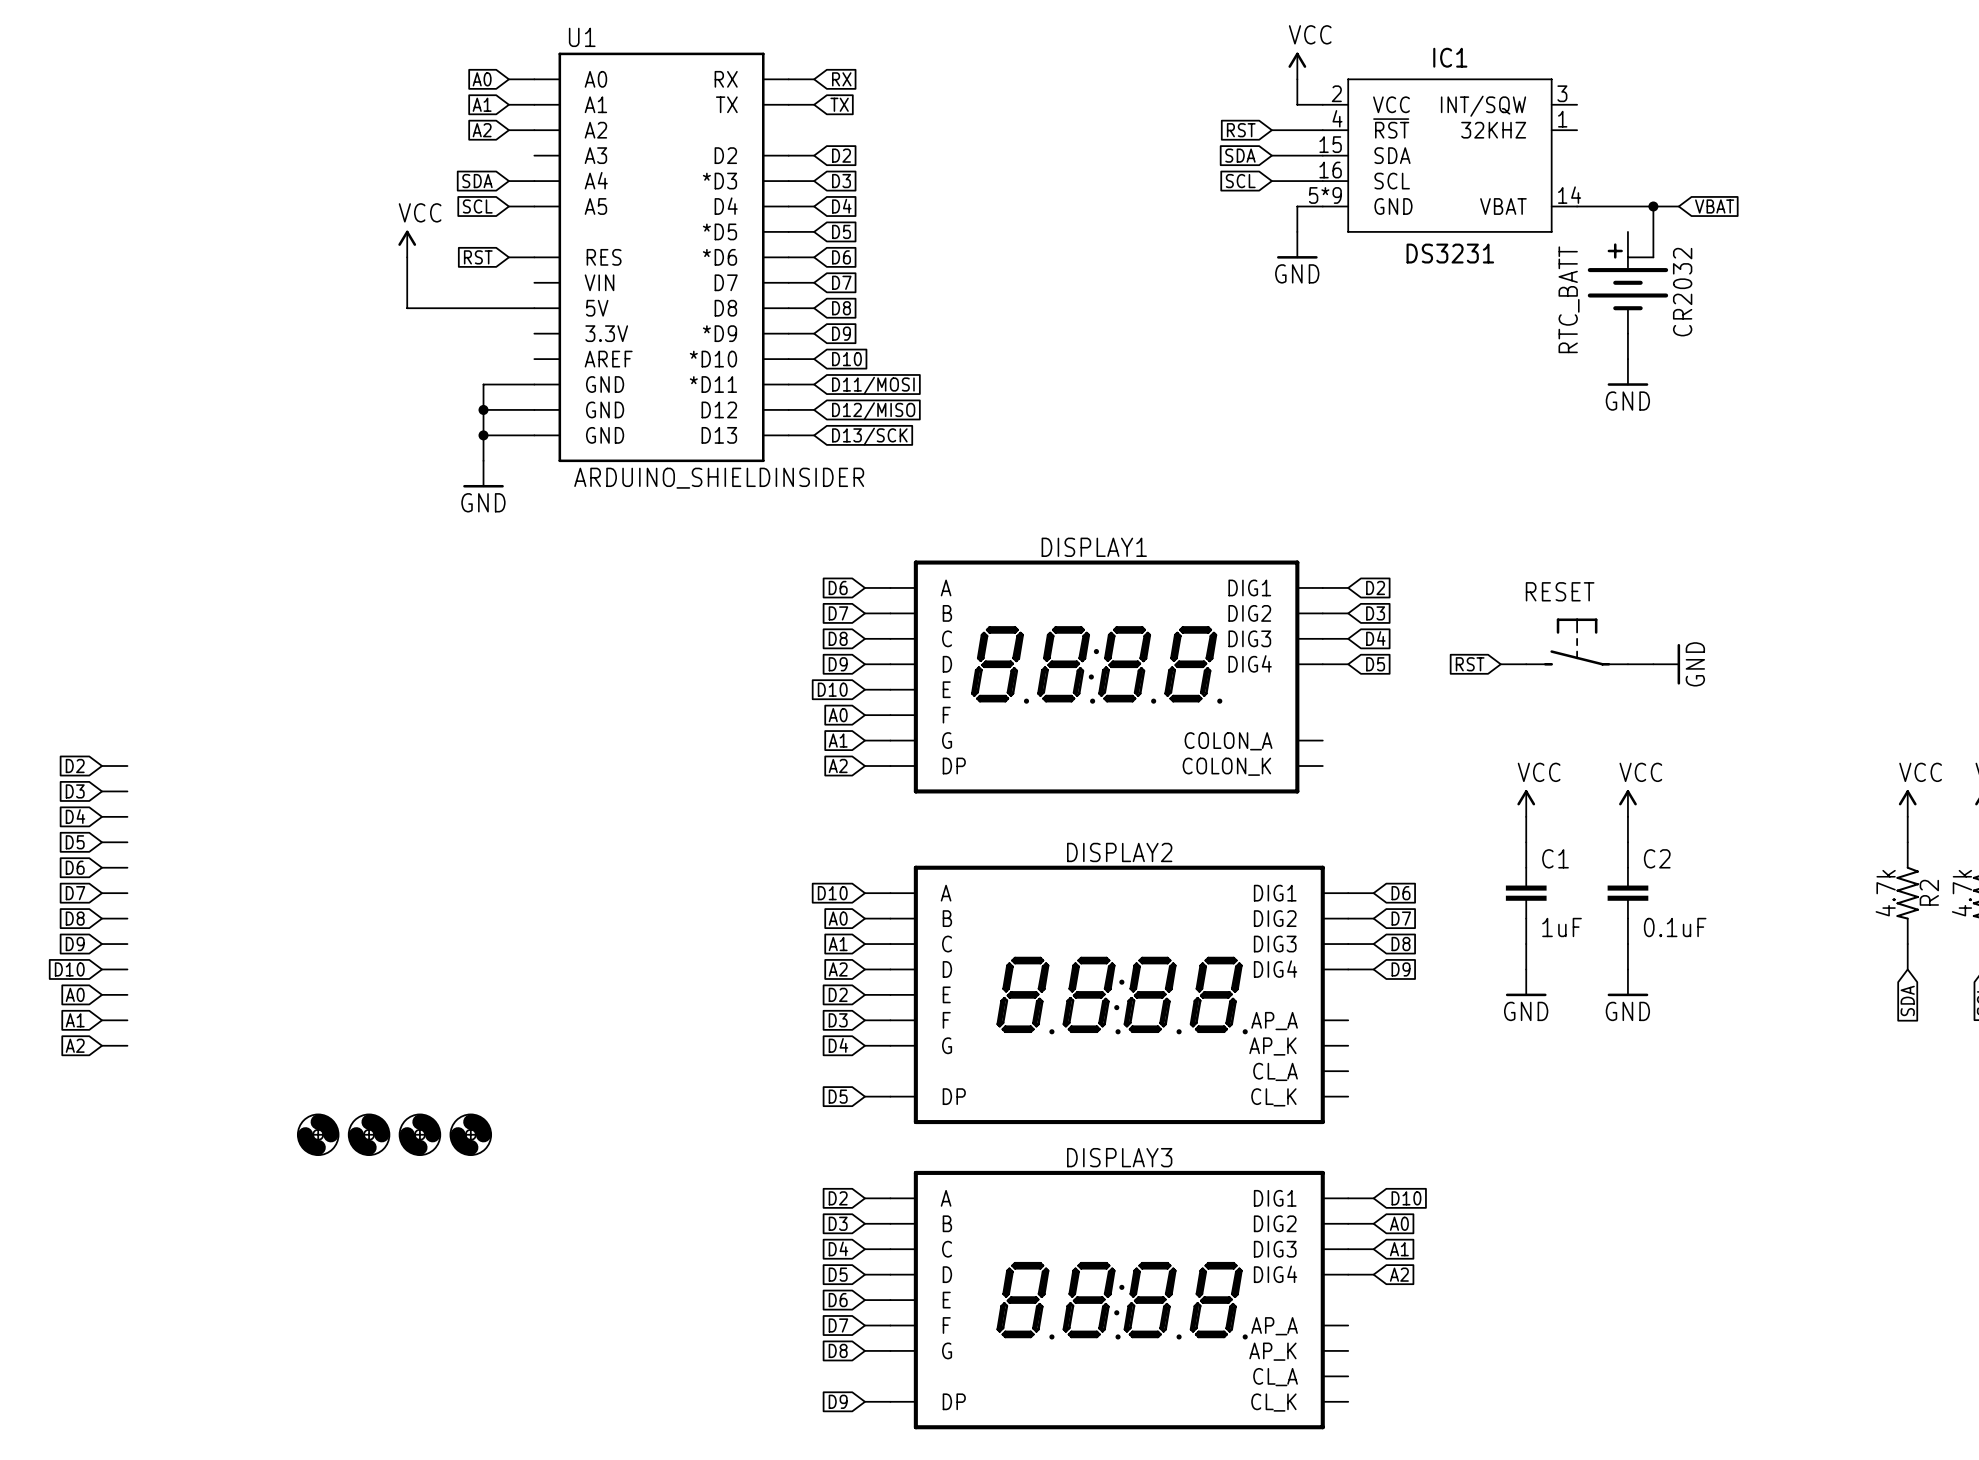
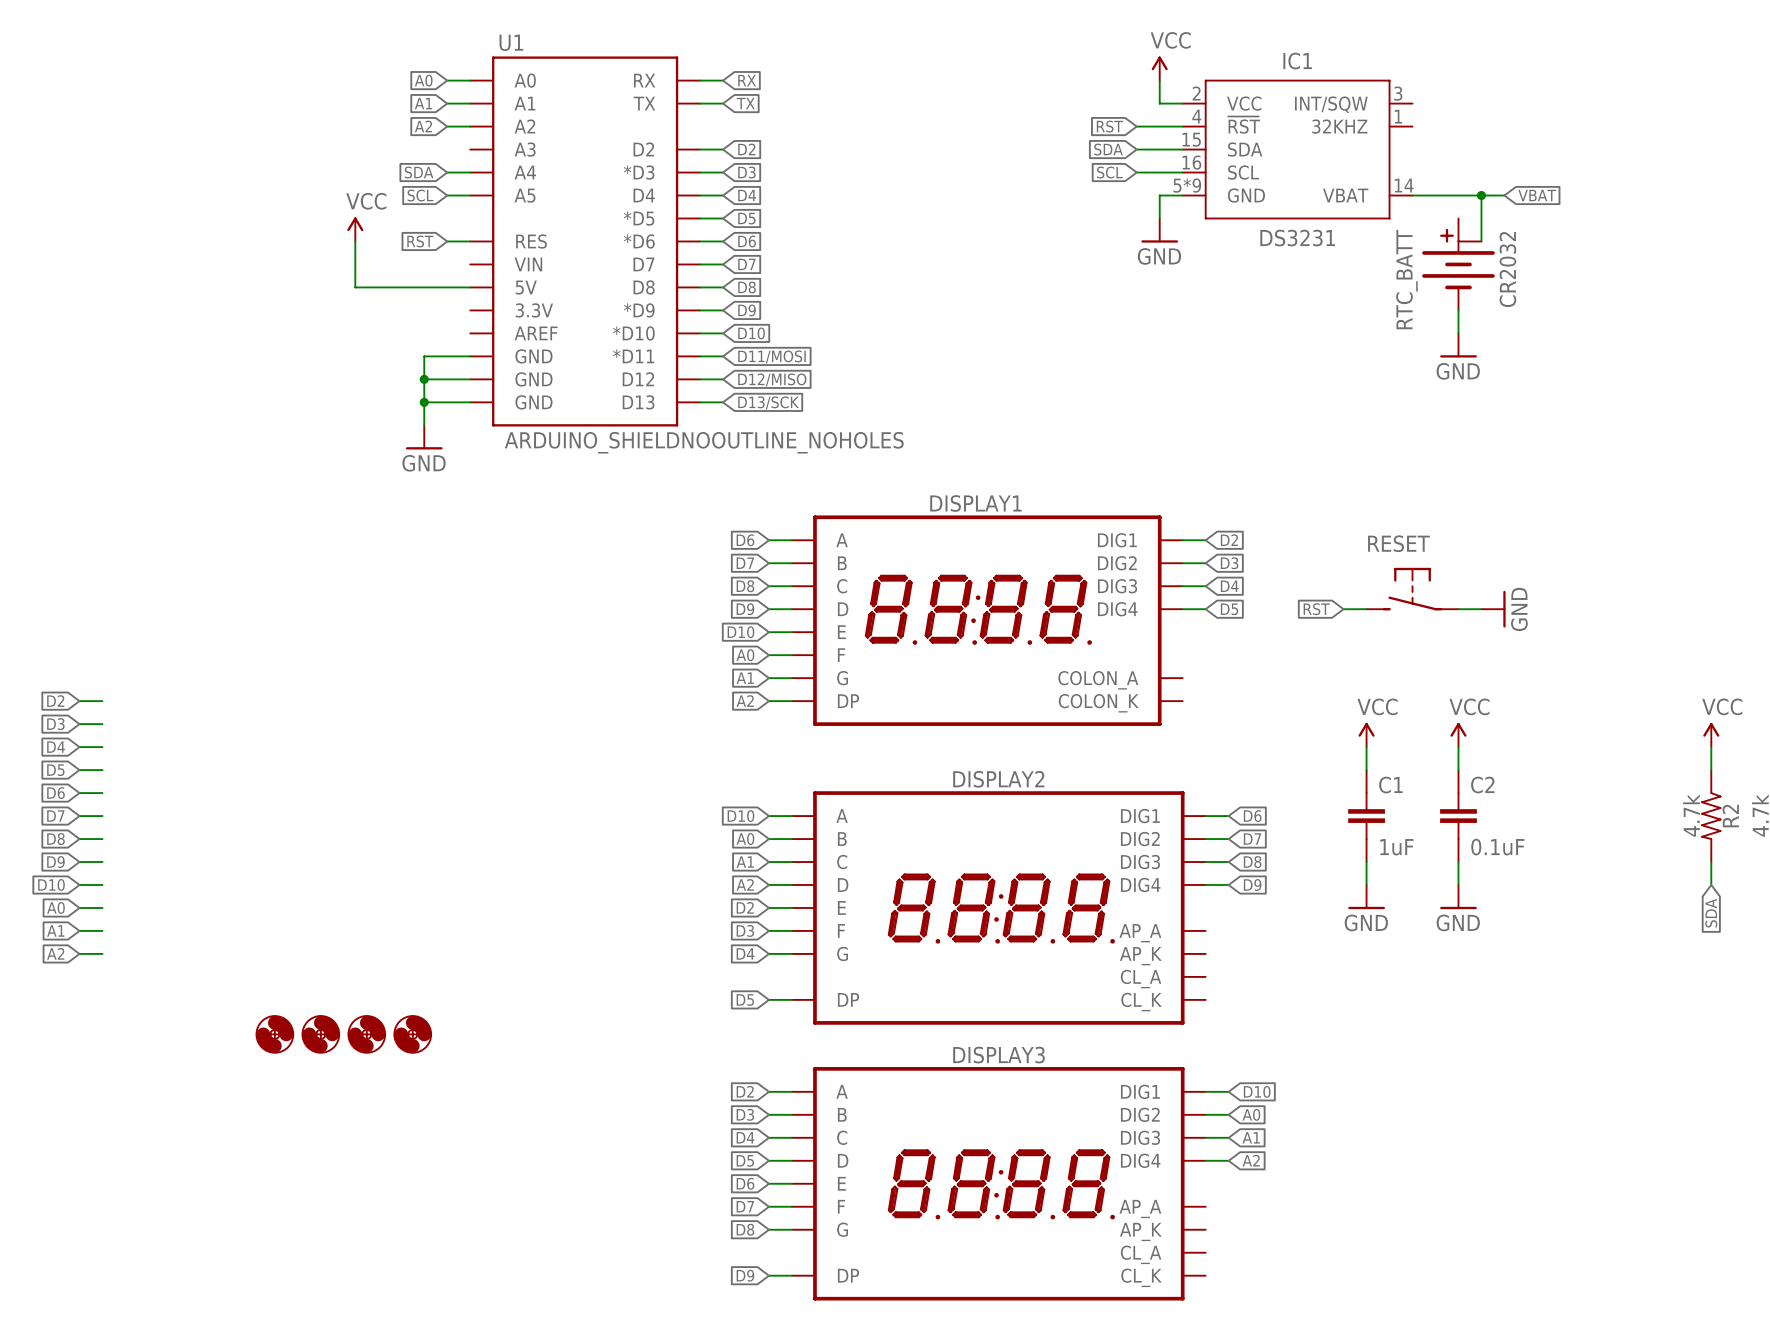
U1 value: ARDUINO_SHIELDINSIDER (719, 478) -> ARDUINO_SHIELDNOOUTLINE_NOHOLES (704, 442)

